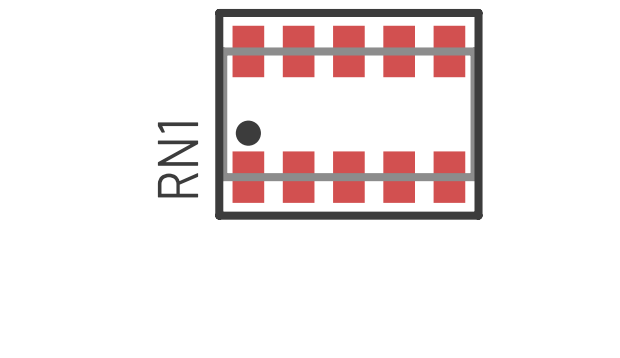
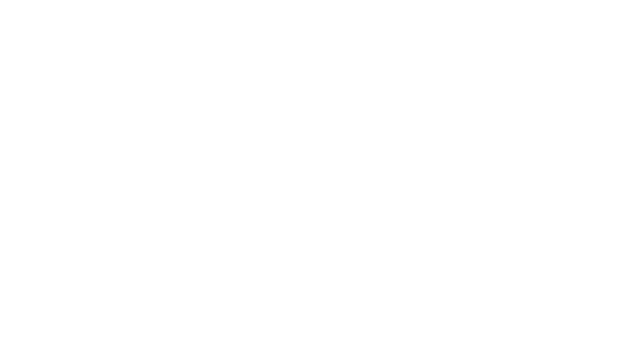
RN1: (348, 114) -> none

